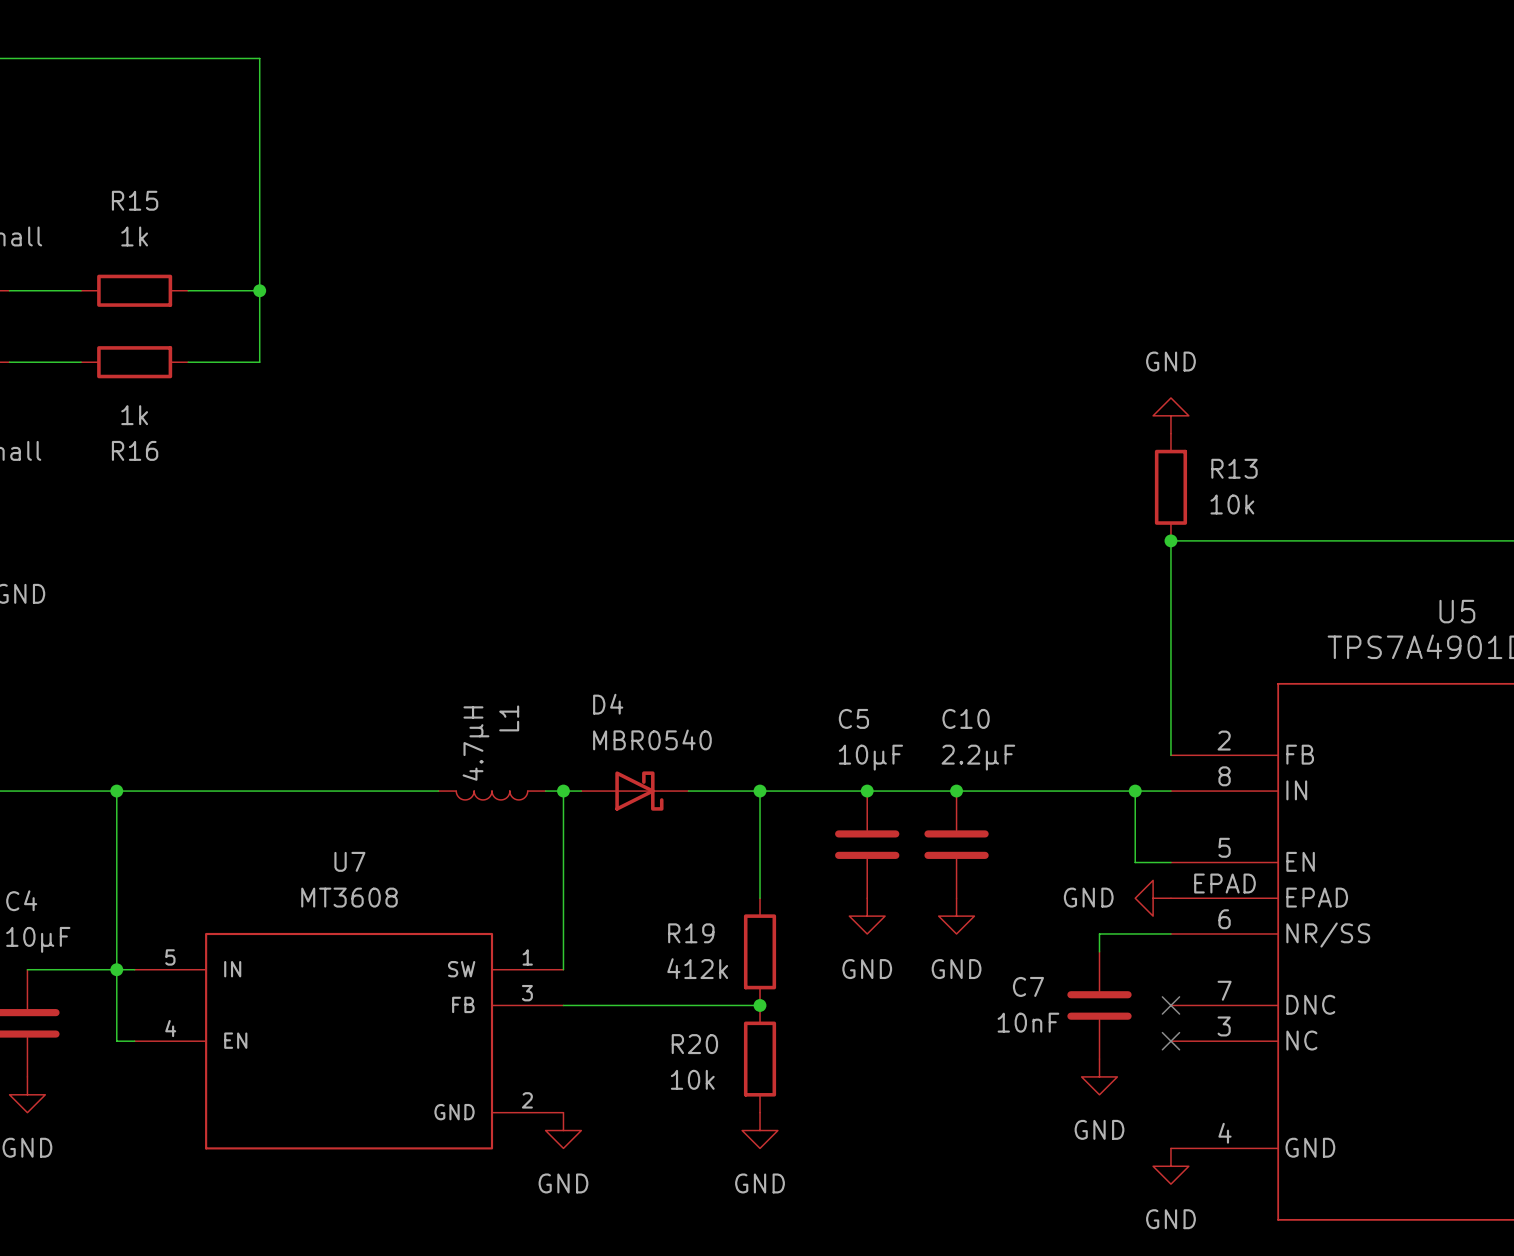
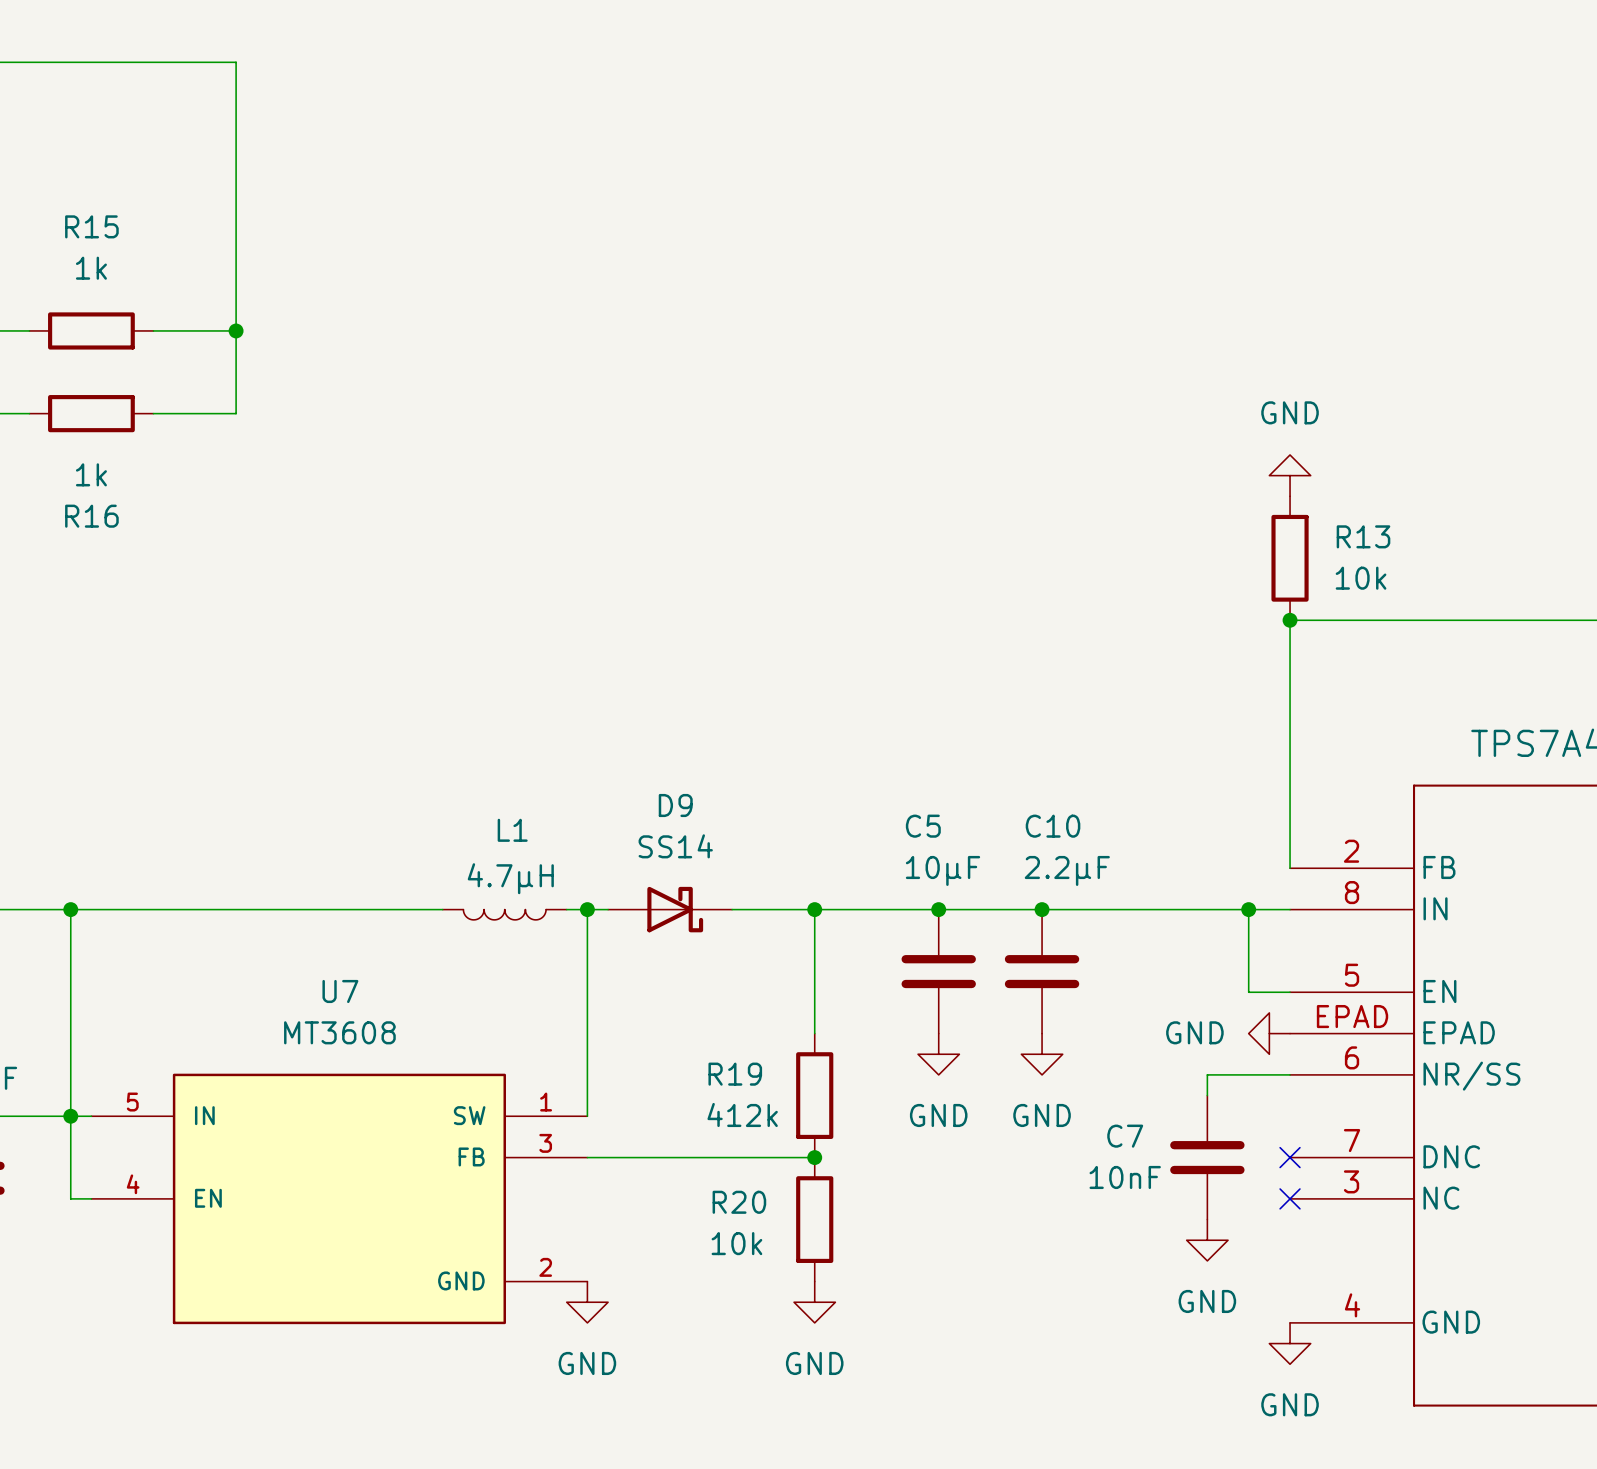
D4 name: D4 (608, 704) -> D9 (675, 805)
L1 name rotation: 0° (509, 718) -> 90° clockwise (512, 830)
D4 value: MBR0540 (652, 739) -> SS14 (675, 846)
L1 value rotation: 0° (476, 743) -> 90° clockwise (510, 878)

